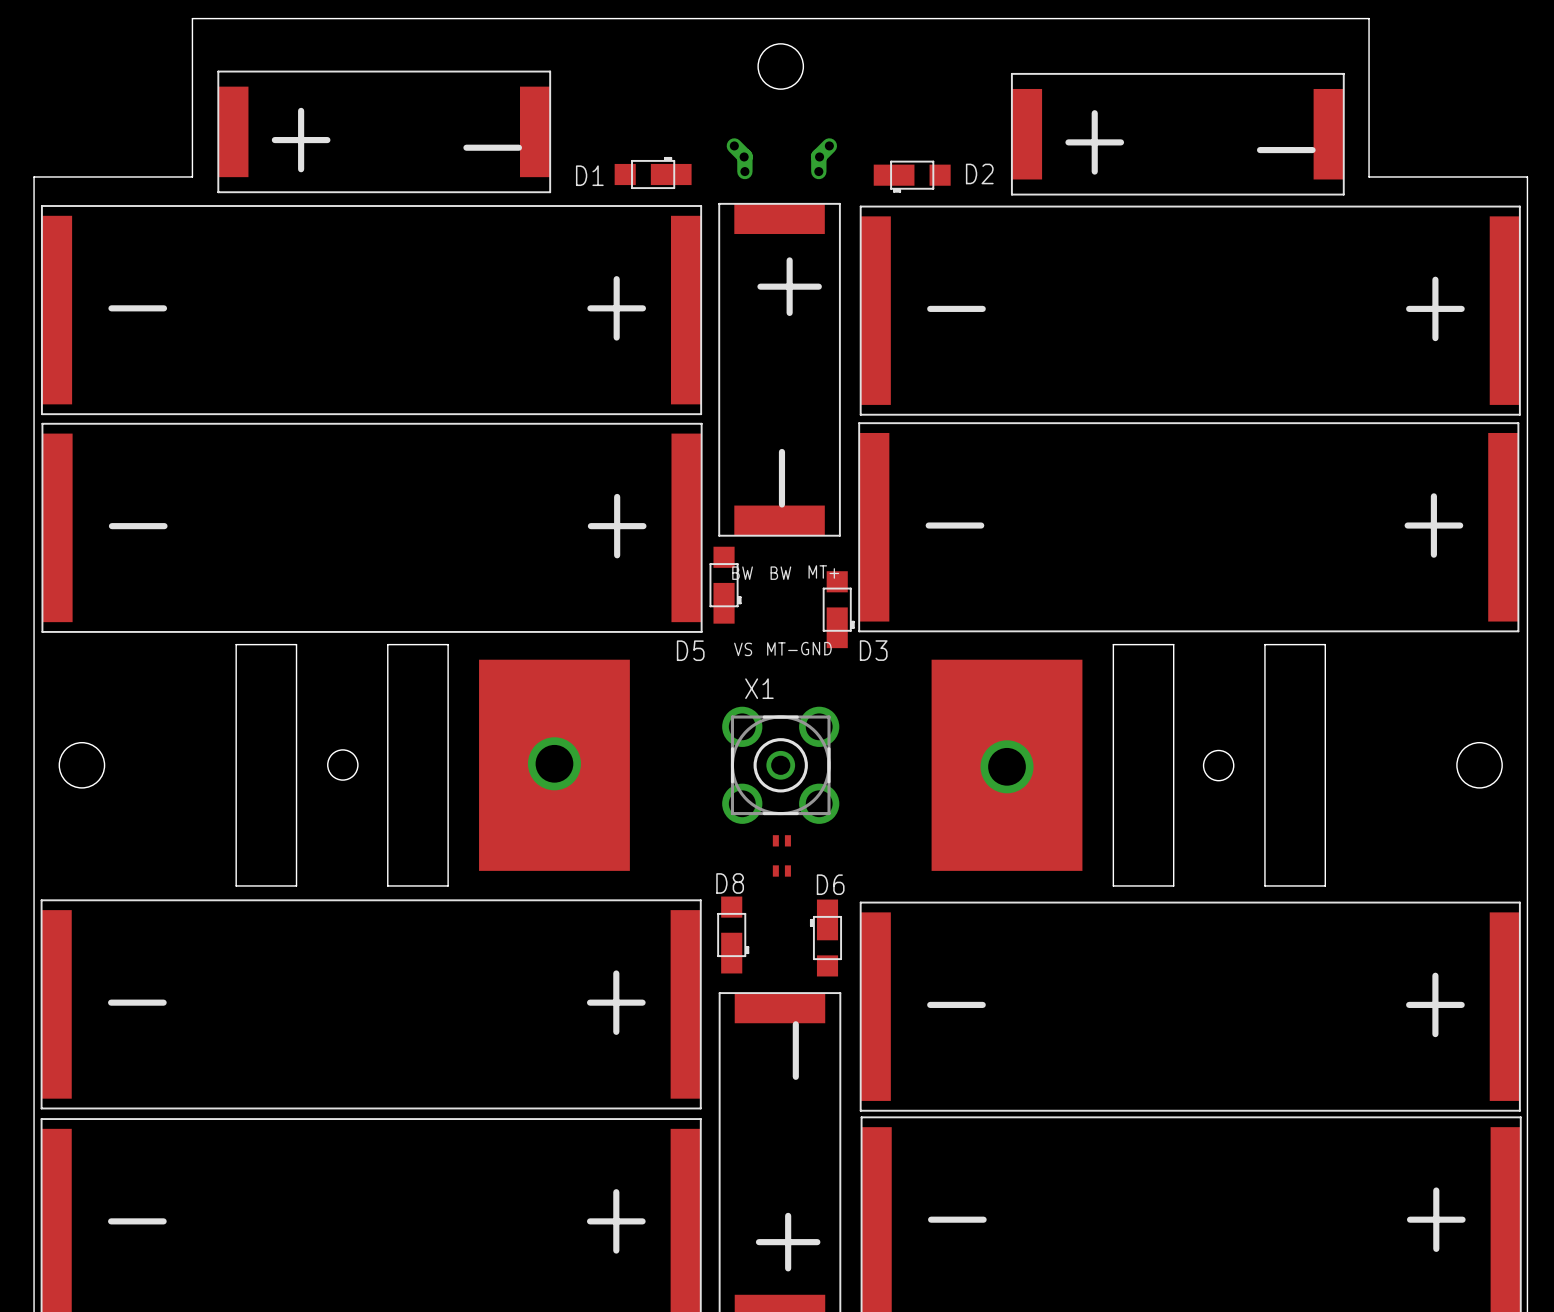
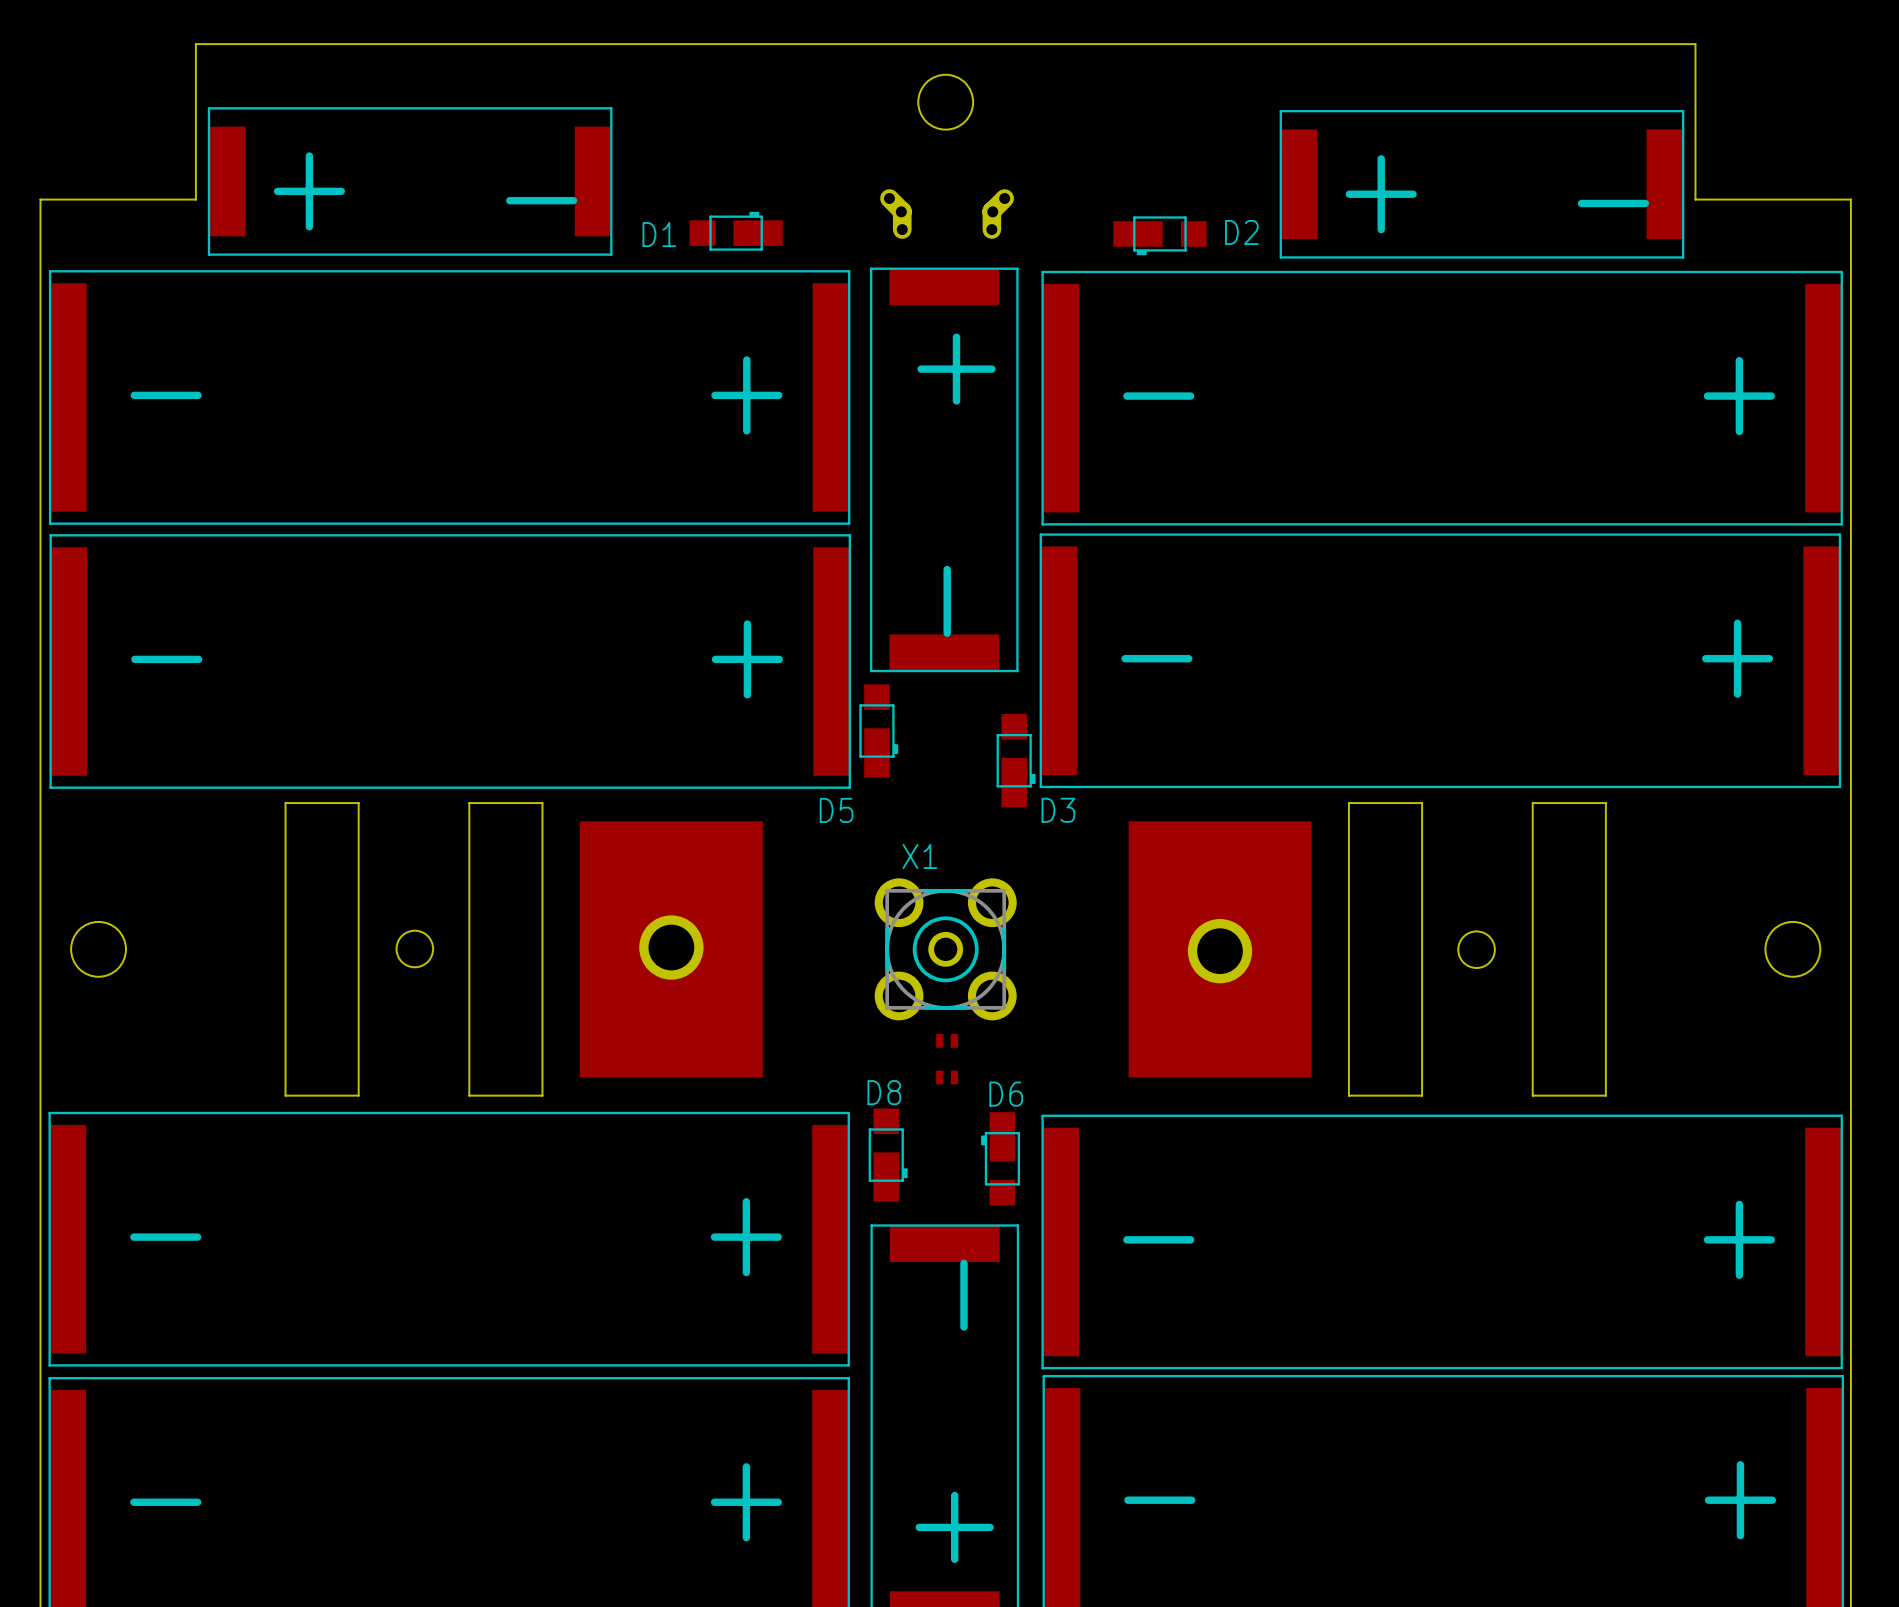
board edge: (192, 18) (192, 176) (34, 176) -> (232, 44) (195, 44) (195, 199) (40, 199) (40, 236)
board edge: (1369, 18) (1369, 176) (1527, 176) -> (1658, 44) (1695, 44) (1695, 199) (1850, 199) (1850, 236)
part position: (384, 131) -> (410, 181)
part position: (1177, 134) -> (1481, 184)
D1 position: (653, 172) -> (736, 231)
D2 position: (912, 176) -> (1159, 235)
text: MT+ (823, 571) -> none
text: BW (742, 573) -> none
text: BW (780, 573) -> none
text: GND (816, 648) -> none
text: VS (743, 649) -> none
text: MT- (782, 649) -> none

